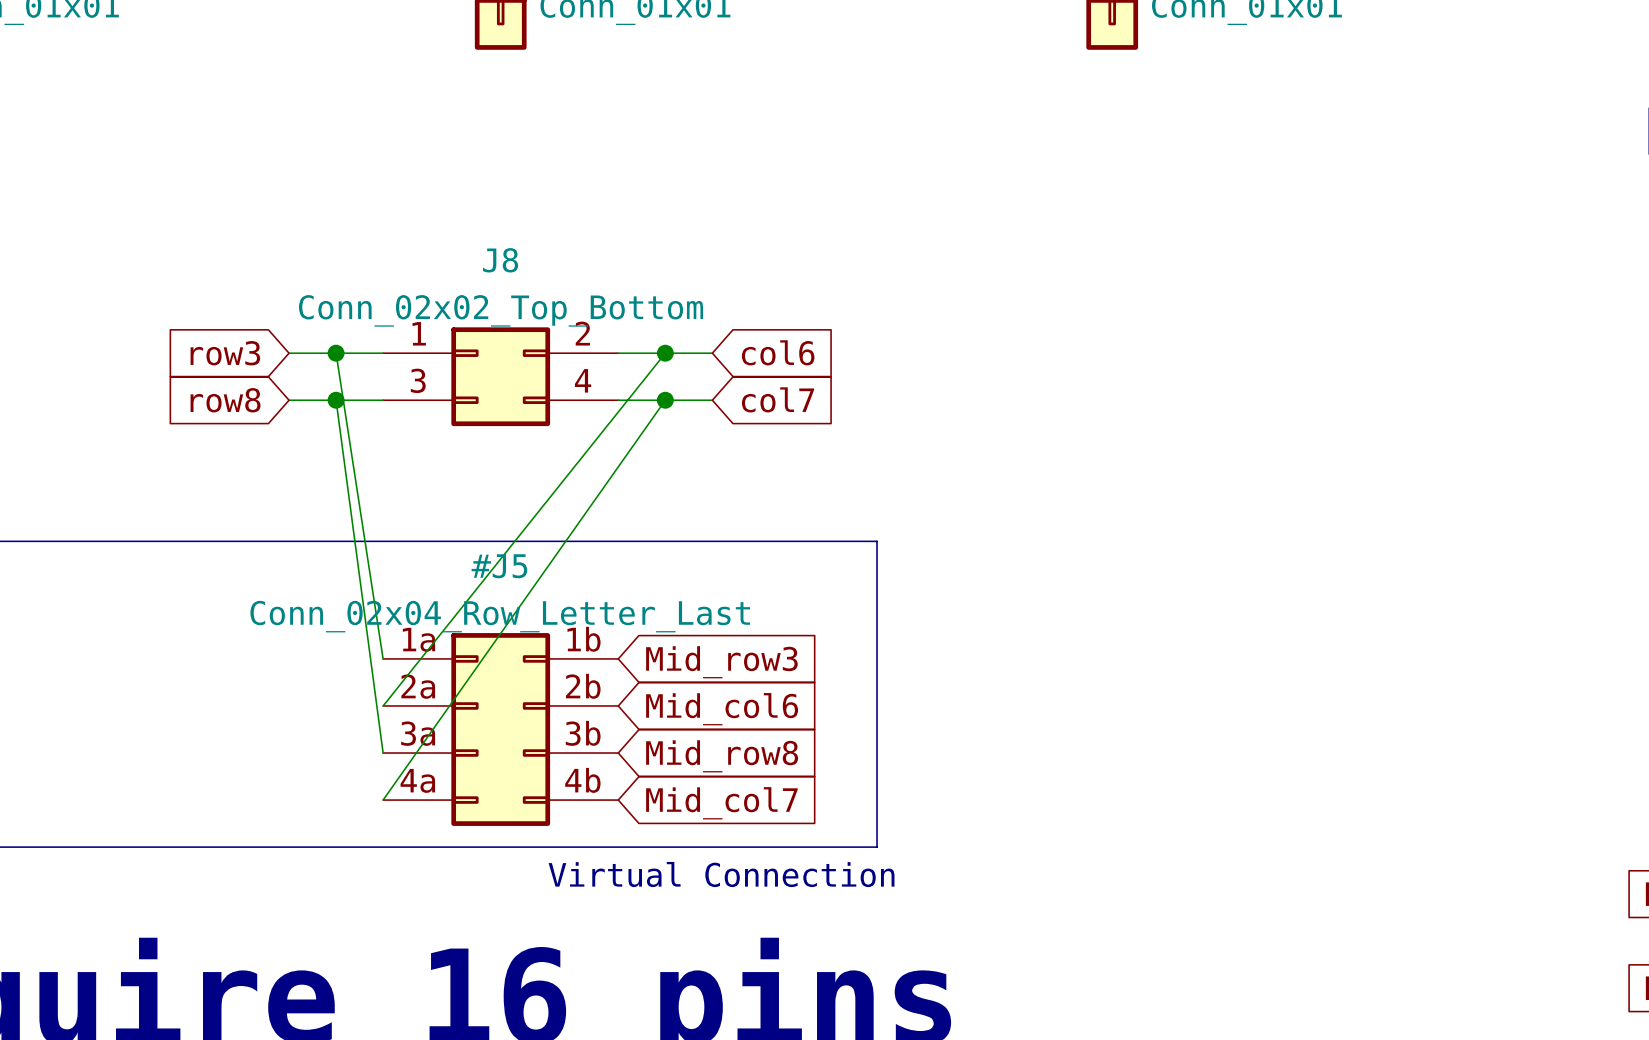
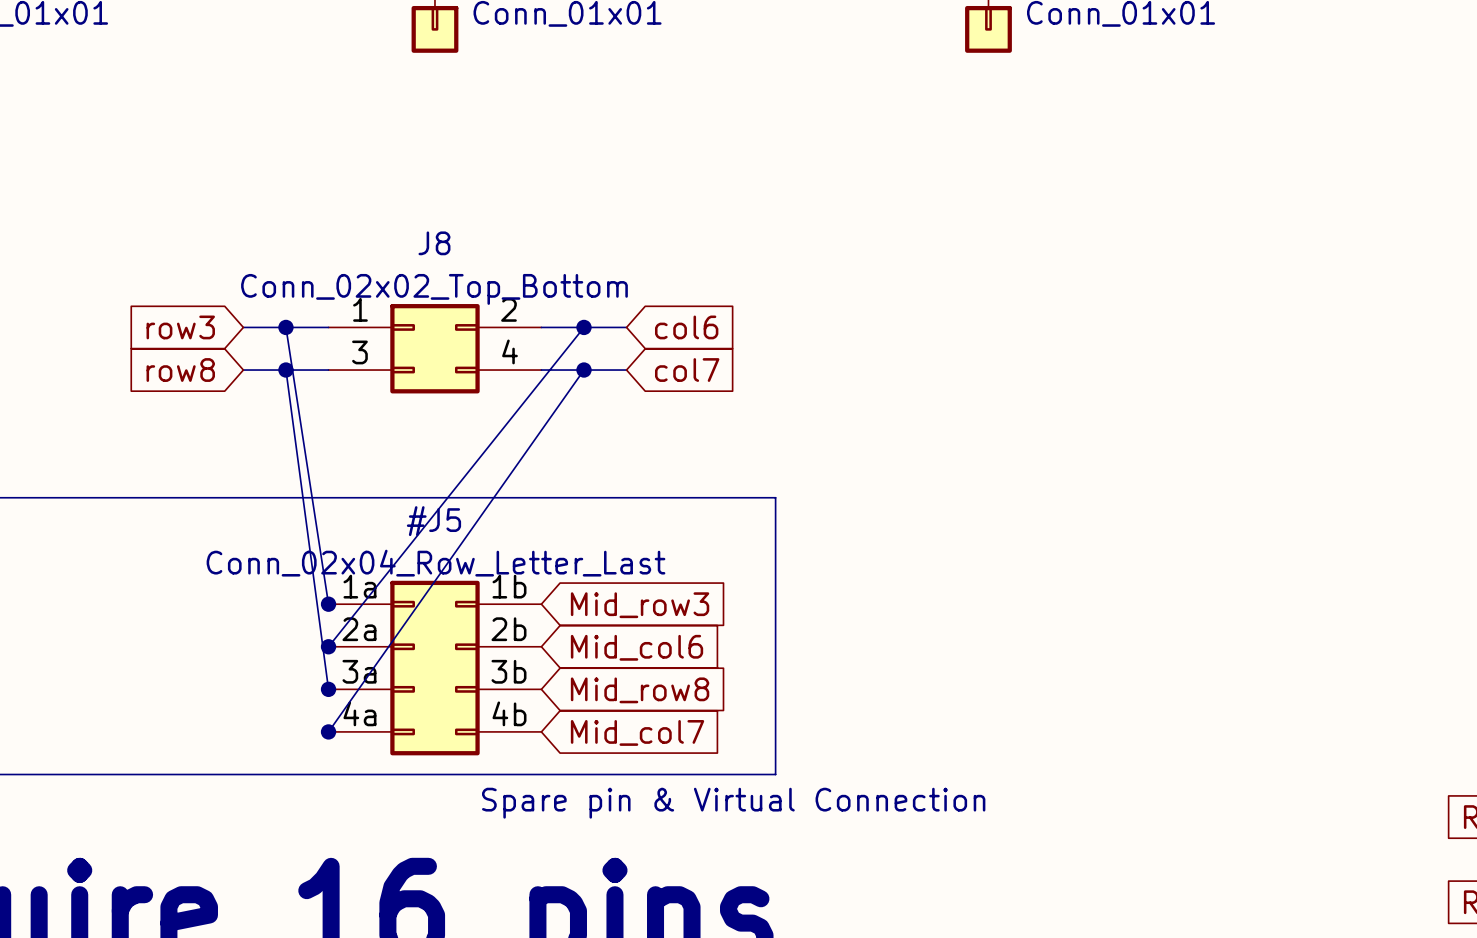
junction: none -> (328, 604)
junction: none -> (328, 646)
junction: none -> (328, 689)
junction: none -> (328, 731)
text: Virtual Connection (721, 874) -> Spare pin & Virtual Connection (733, 803)

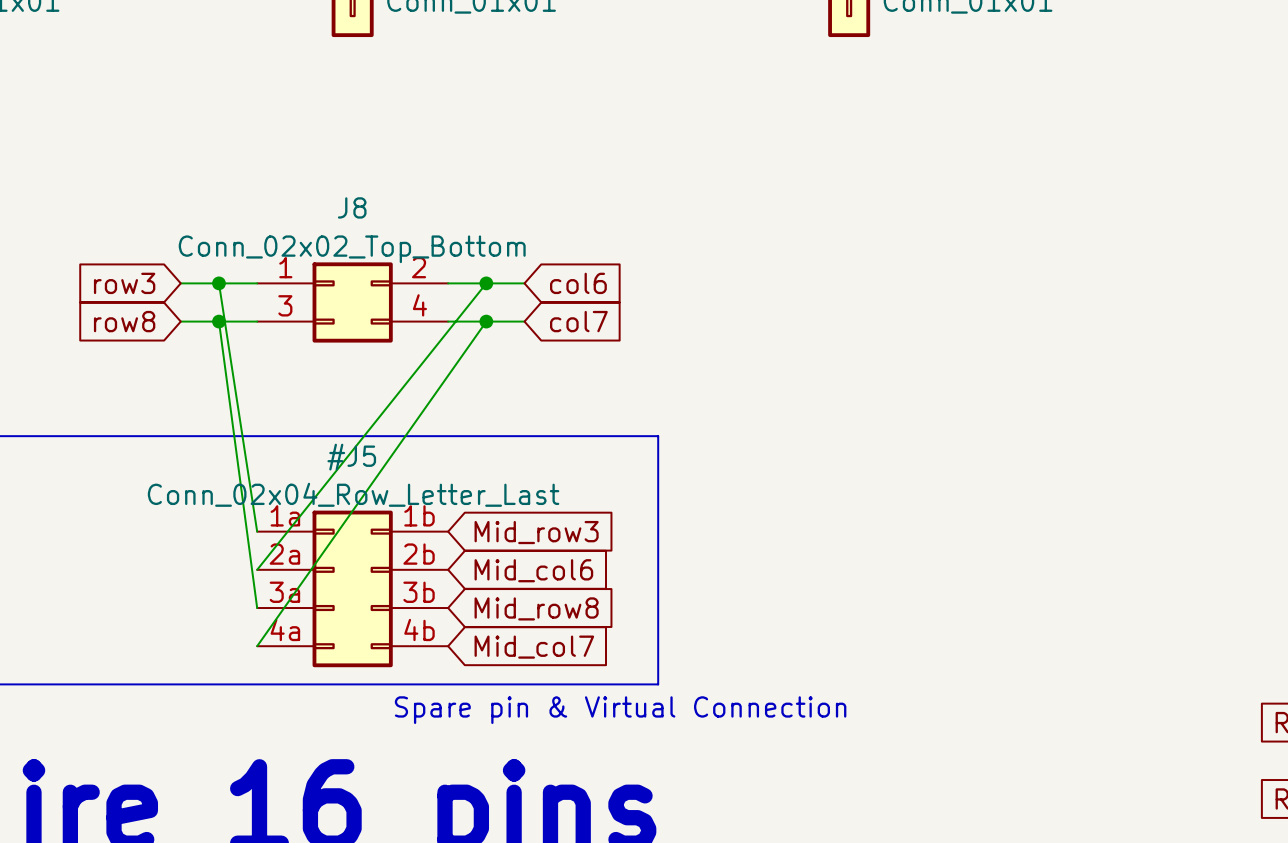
junction: (328, 604) -> none
junction: (328, 646) -> none
junction: (328, 689) -> none
junction: (328, 731) -> none

